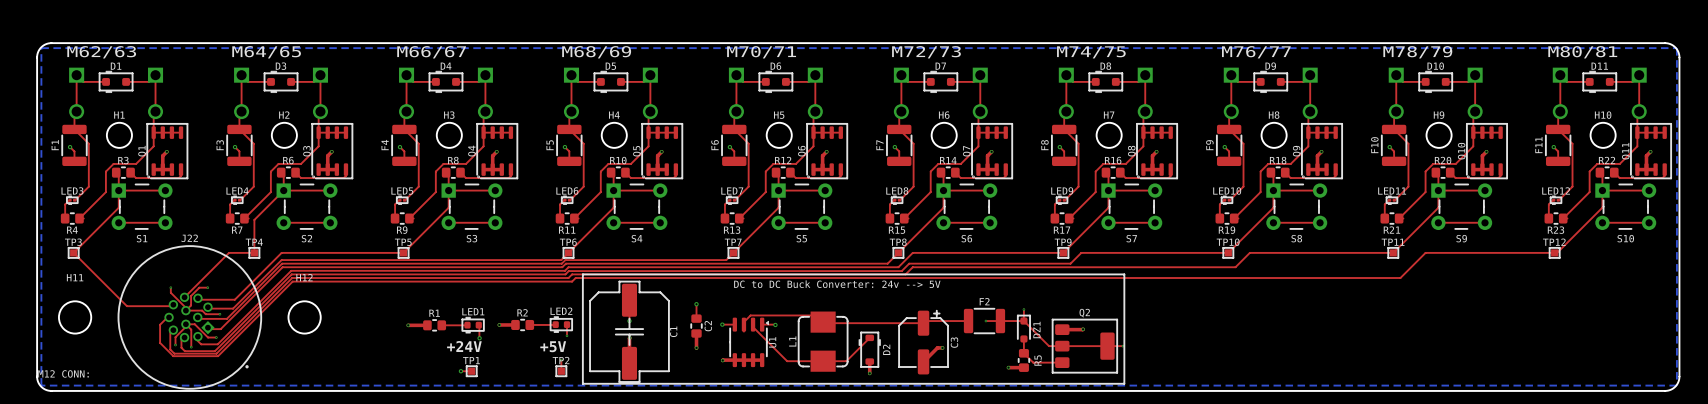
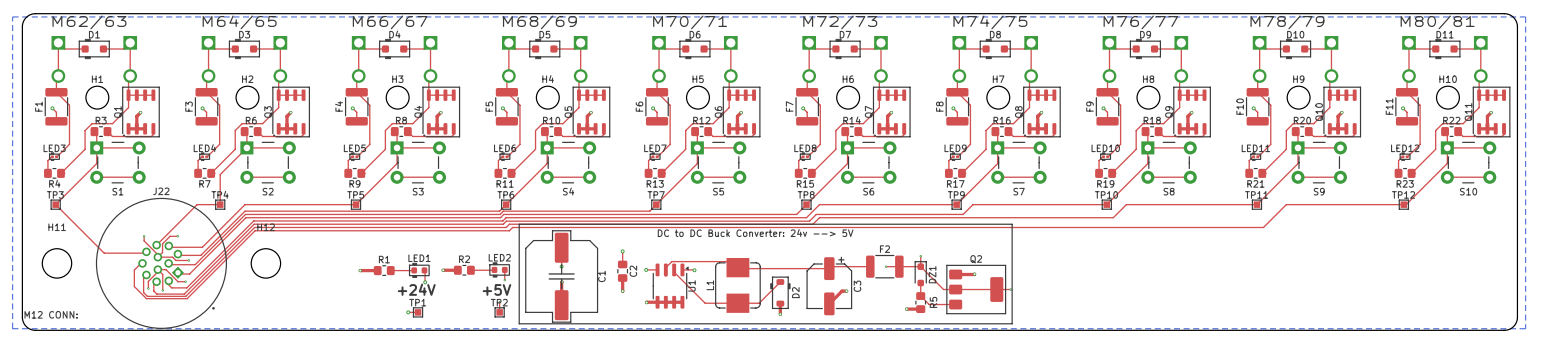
bottom zone outline: (41, 48) (1676, 48) (1676, 385) (41, 385) (41, 48) -> (12, 16) (12, 328) (1525, 328) (1525, 16) (12, 16)

